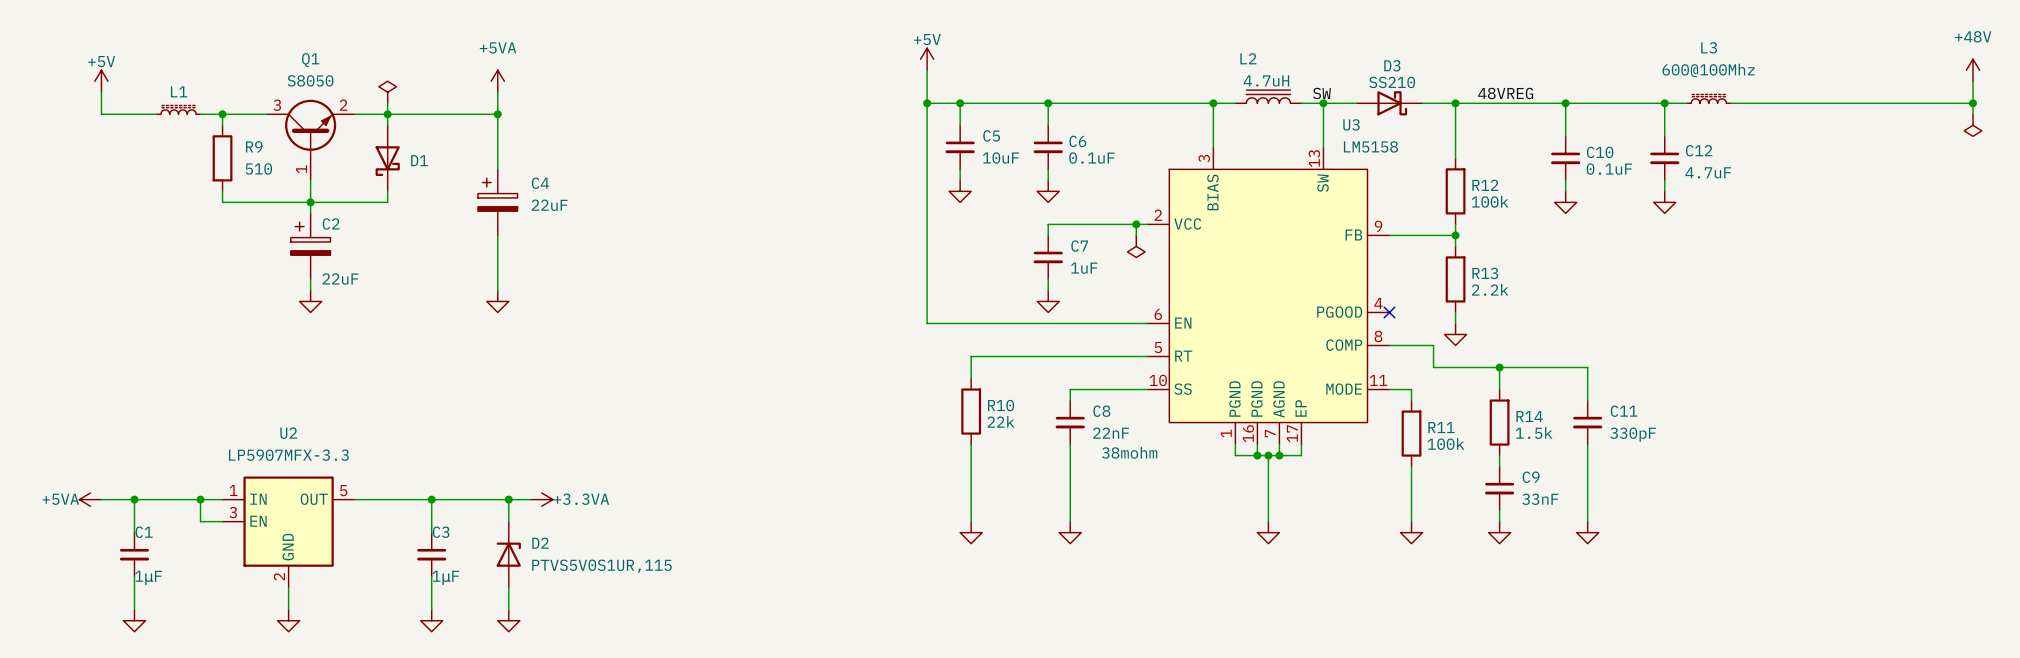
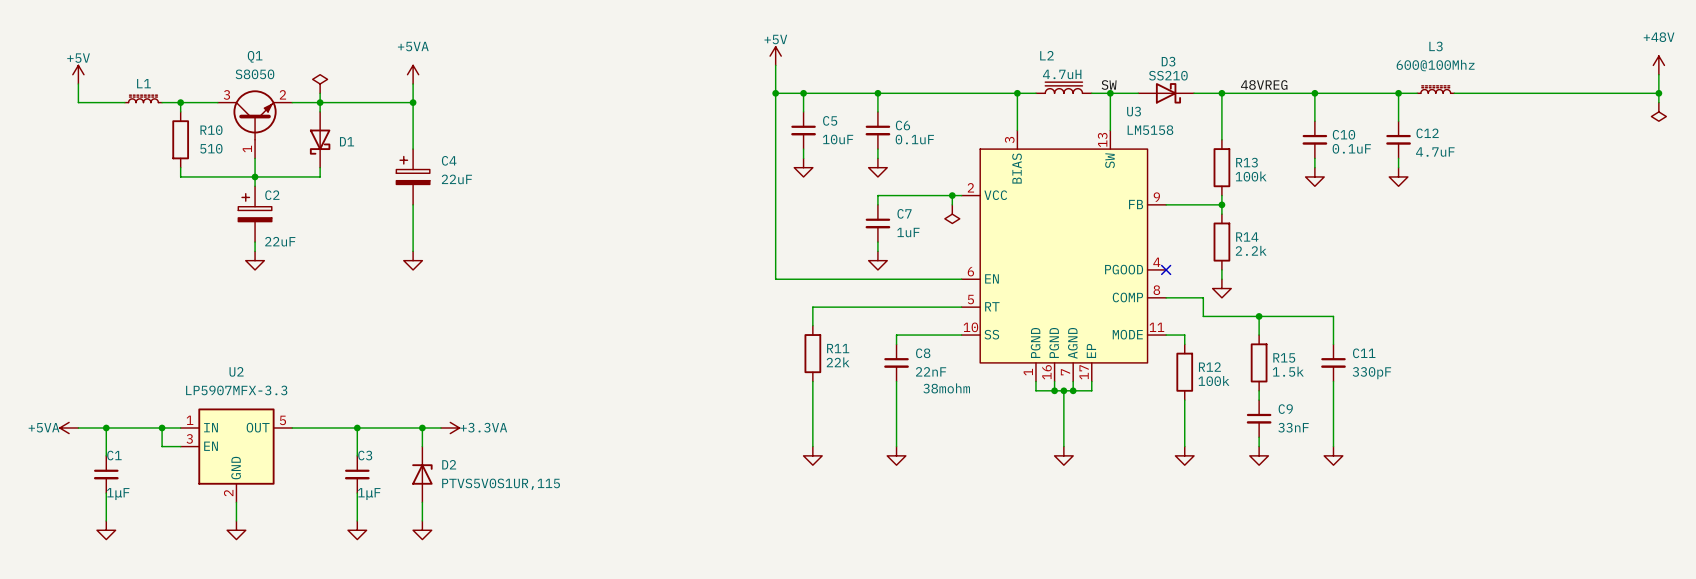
R9 name: R9 (254, 146) -> R10 (211, 130)
R12 name: R12 (1485, 185) -> R13 (1246, 162)
R13 name: R13 (1485, 273) -> R14 (1247, 237)
R10 name: R10 (1001, 405) -> R11 (838, 348)
R14 name: R14 (1529, 416) -> R15 (1284, 357)
R11 name: R11 (1441, 427) -> R12 (1209, 367)

